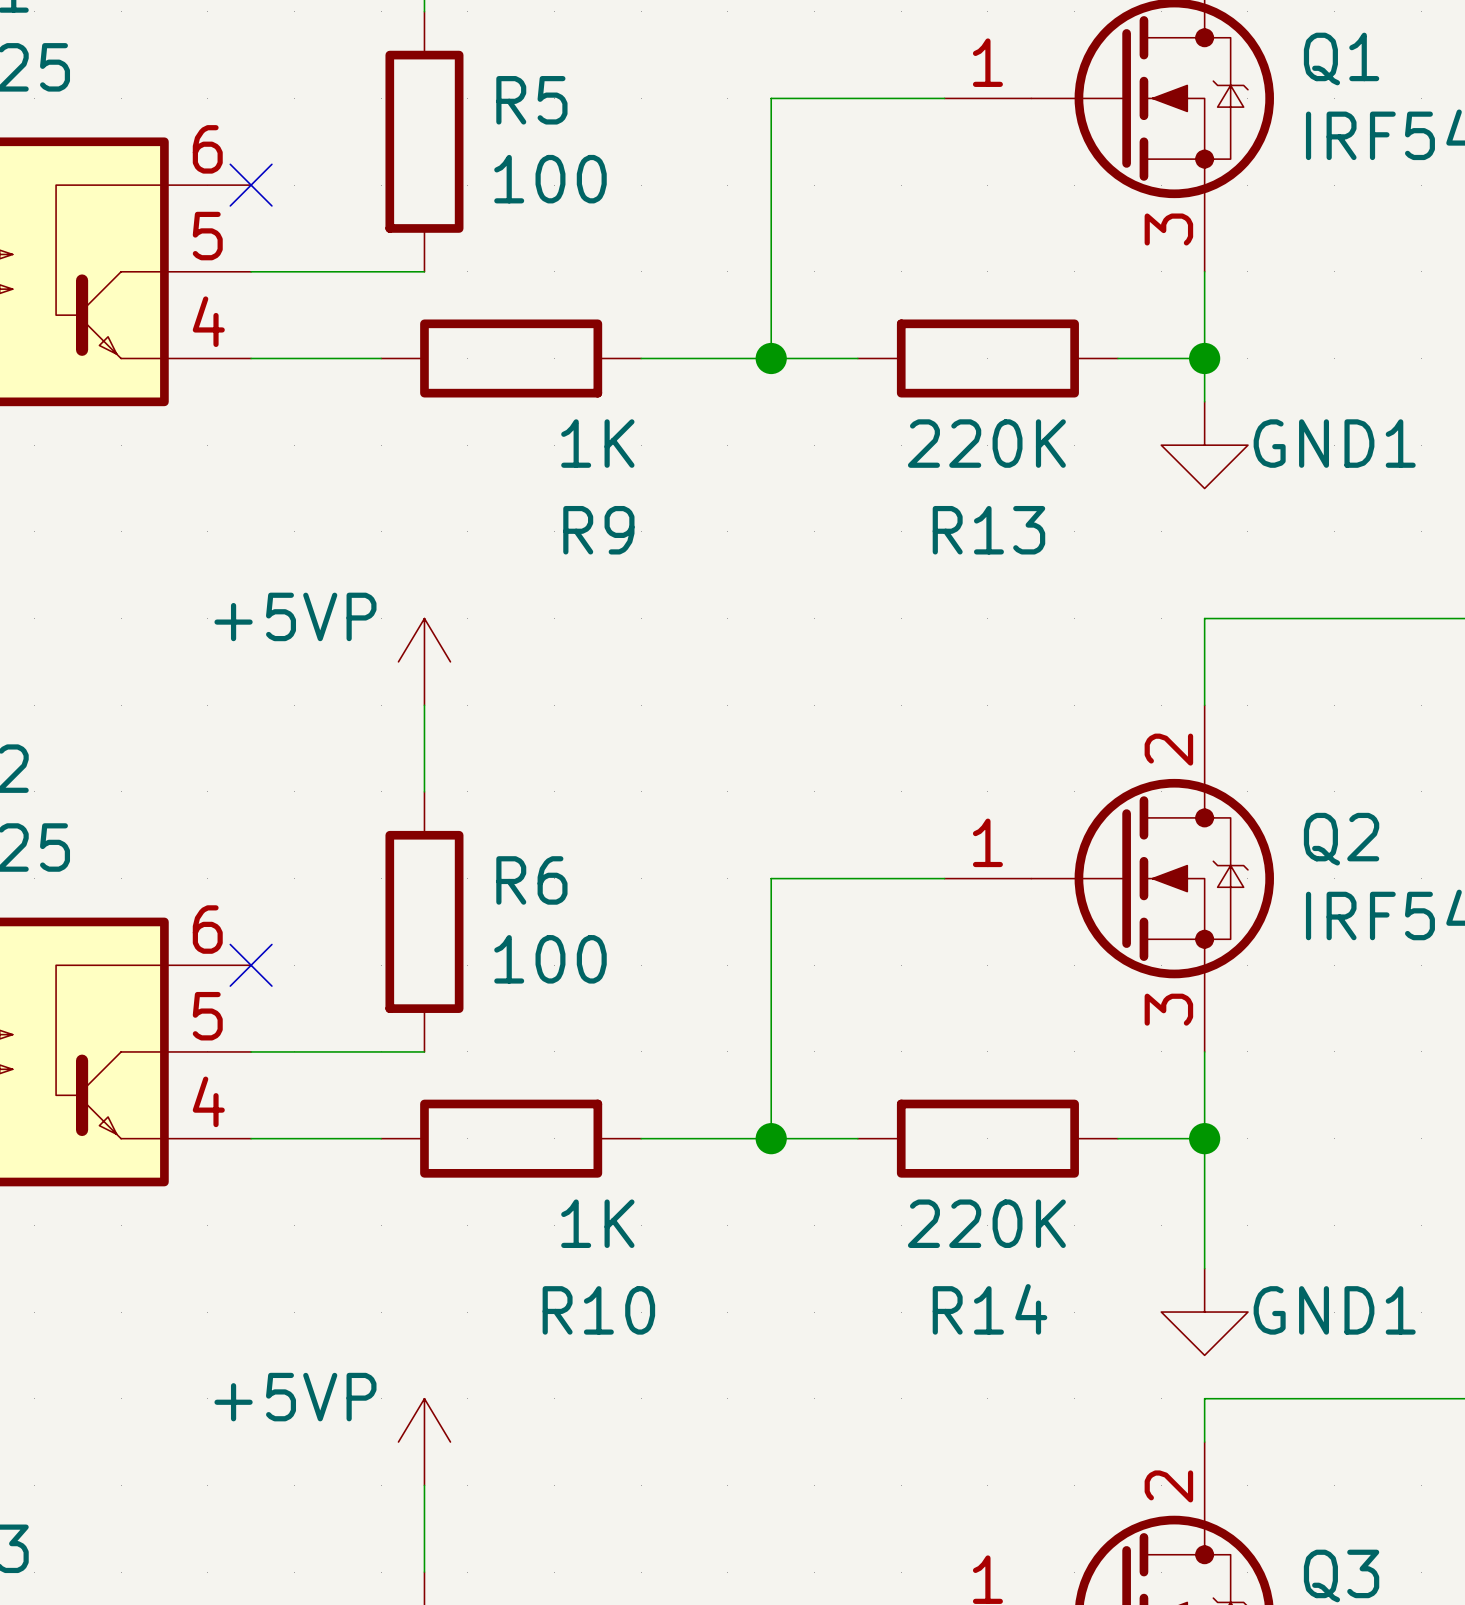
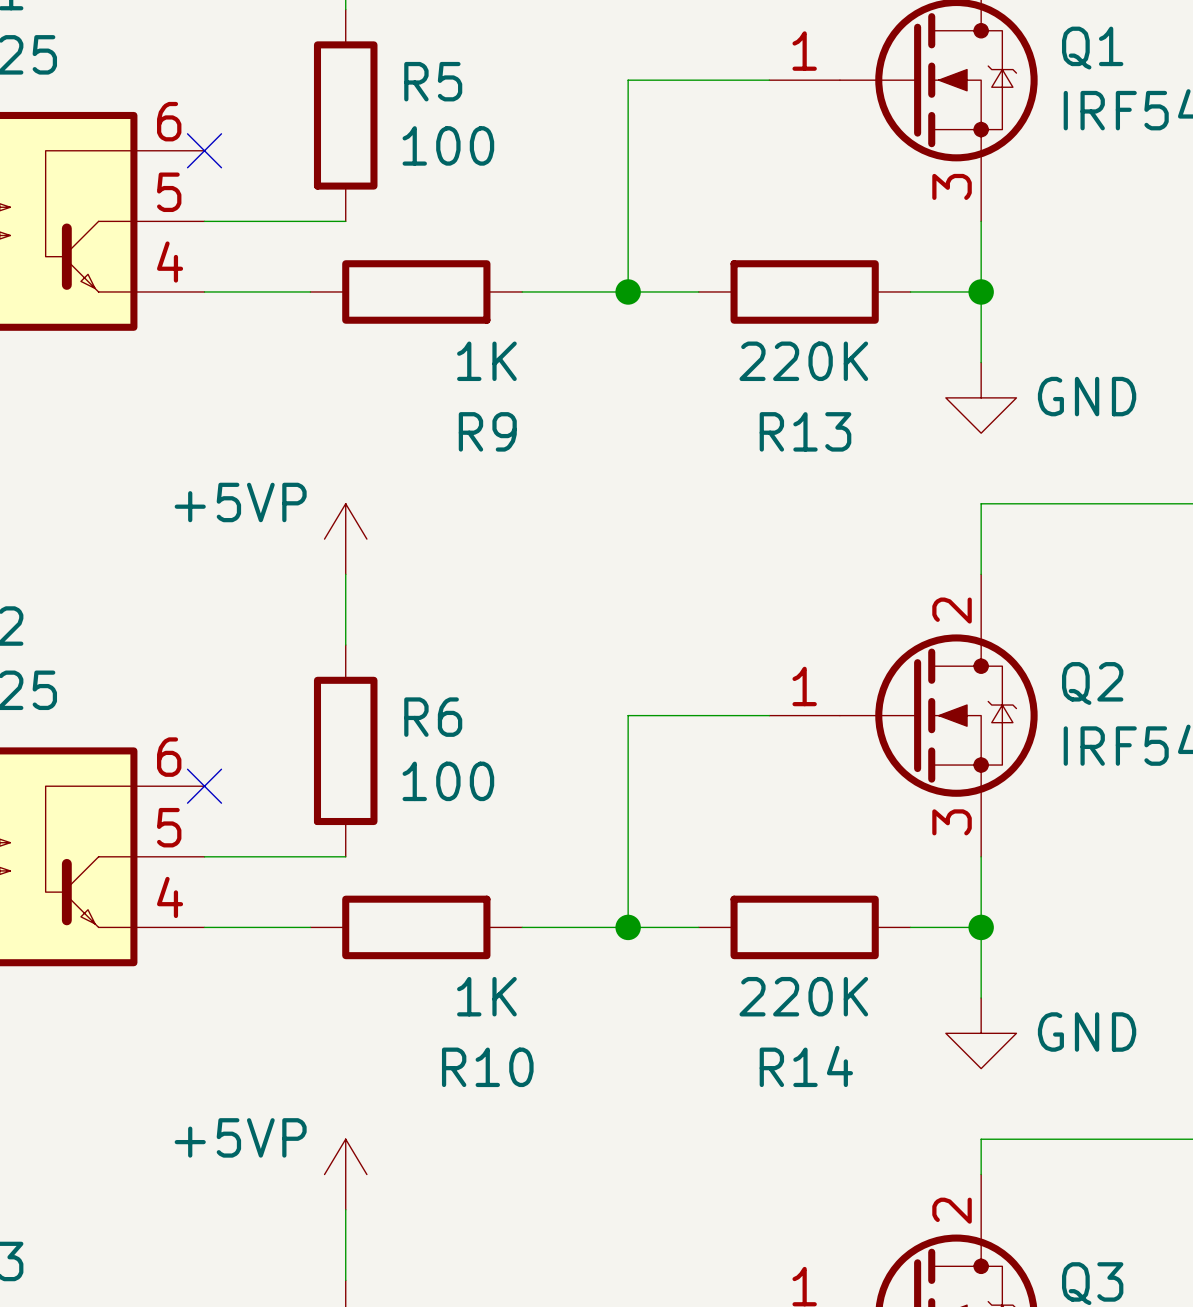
power symbol: GND1 (1204, 445) -> none
power symbol: none -> GND (981, 397)
power symbol: none -> GND (981, 1033)
power symbol: GND1 (1204, 1312) -> none

